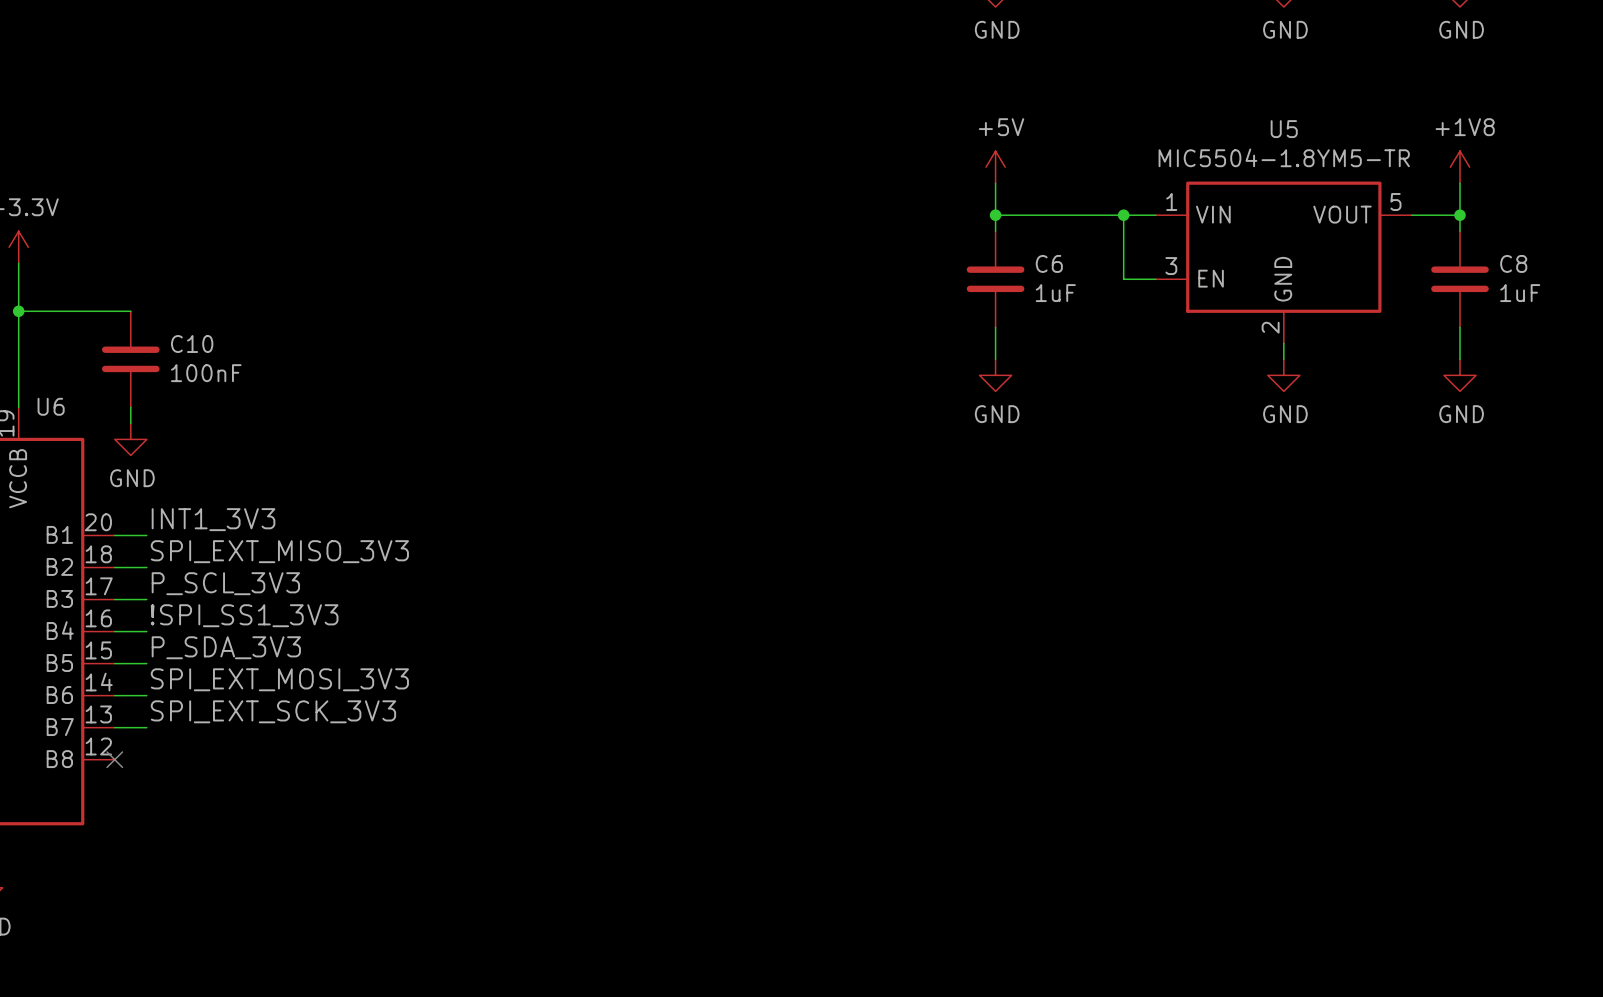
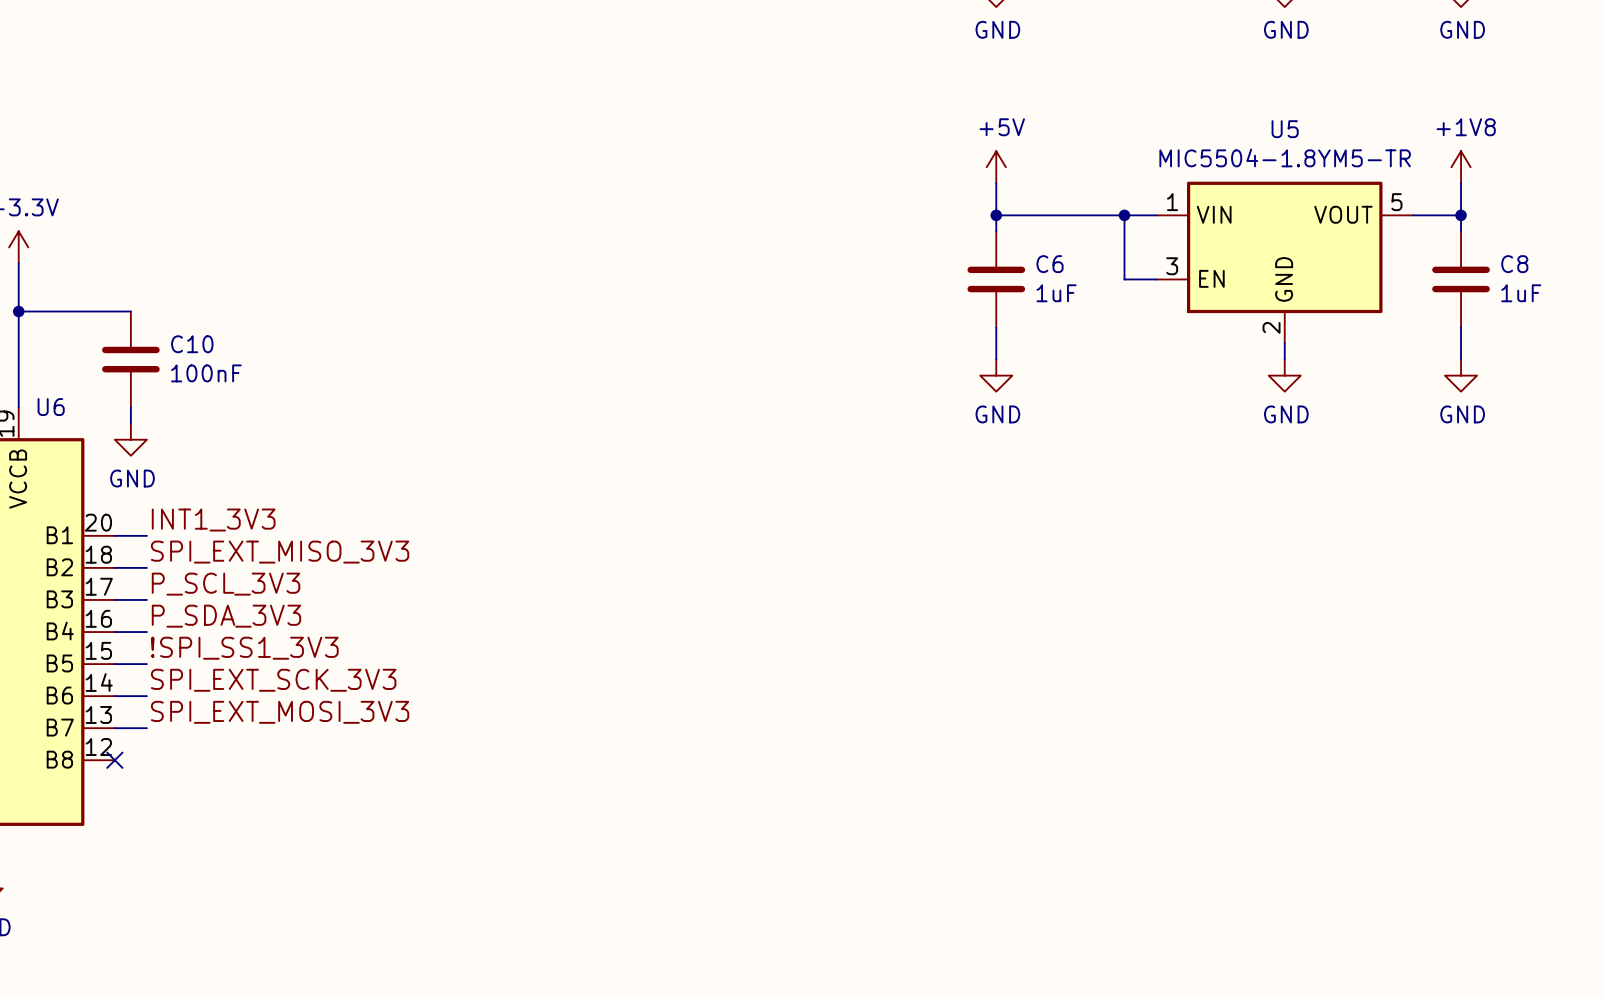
label: !SPI_SS1_3V3 (244, 615) -> P_SDA_3V3 (226, 616)
label: P_SDA_3V3 (226, 647) -> !SPI_SS1_3V3 (244, 648)
label: SPI_EXT_MOSI_3V3 (279, 679) -> SPI_EXT_SCK_3V3 (273, 680)
label: SPI_EXT_SCK_3V3 (273, 711) -> SPI_EXT_MOSI_3V3 (280, 712)

